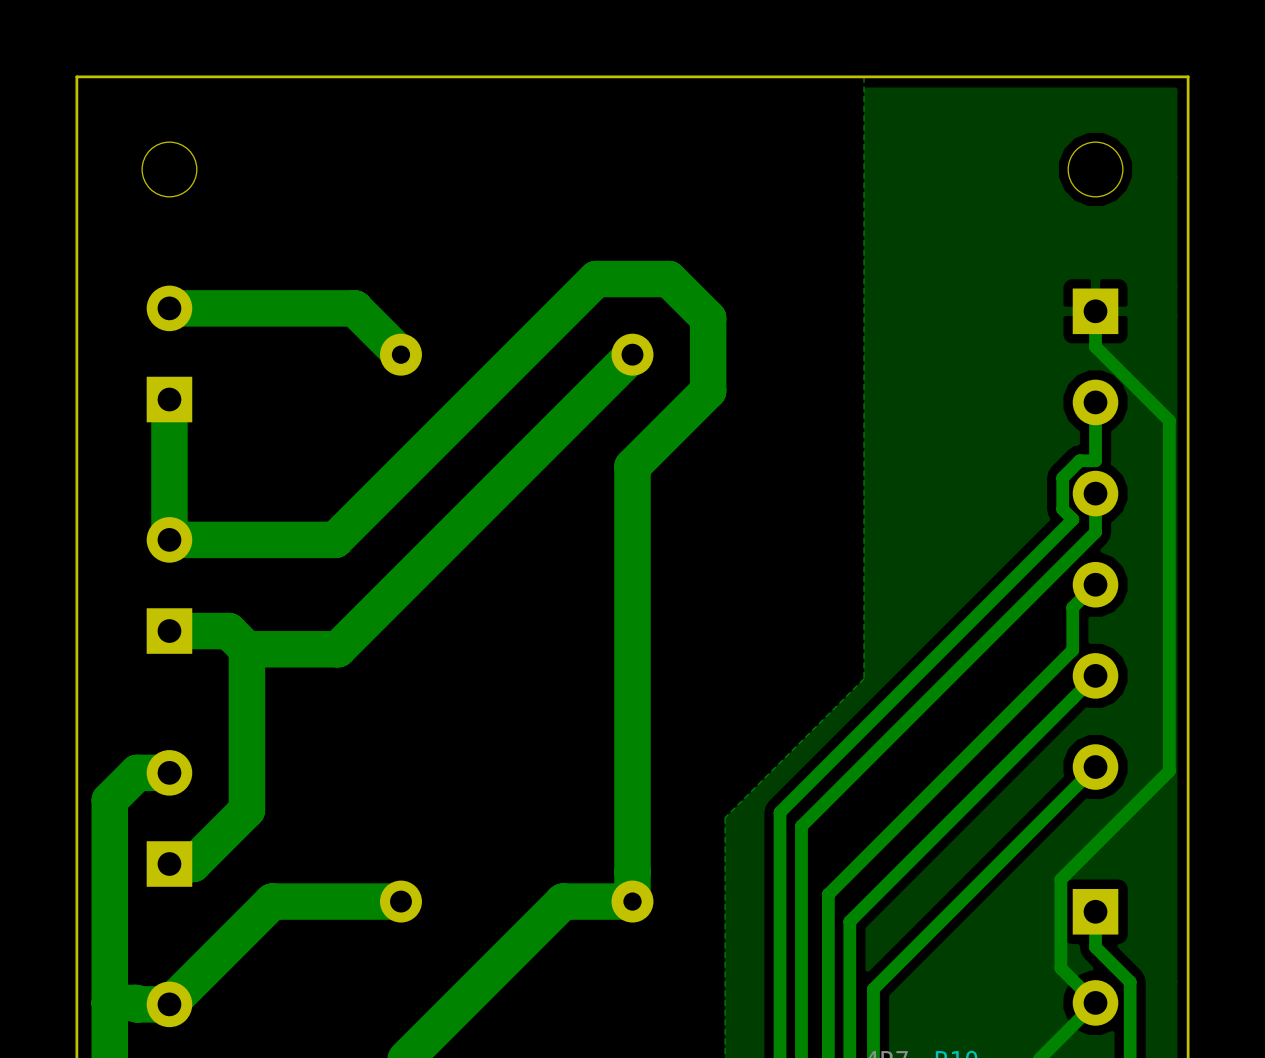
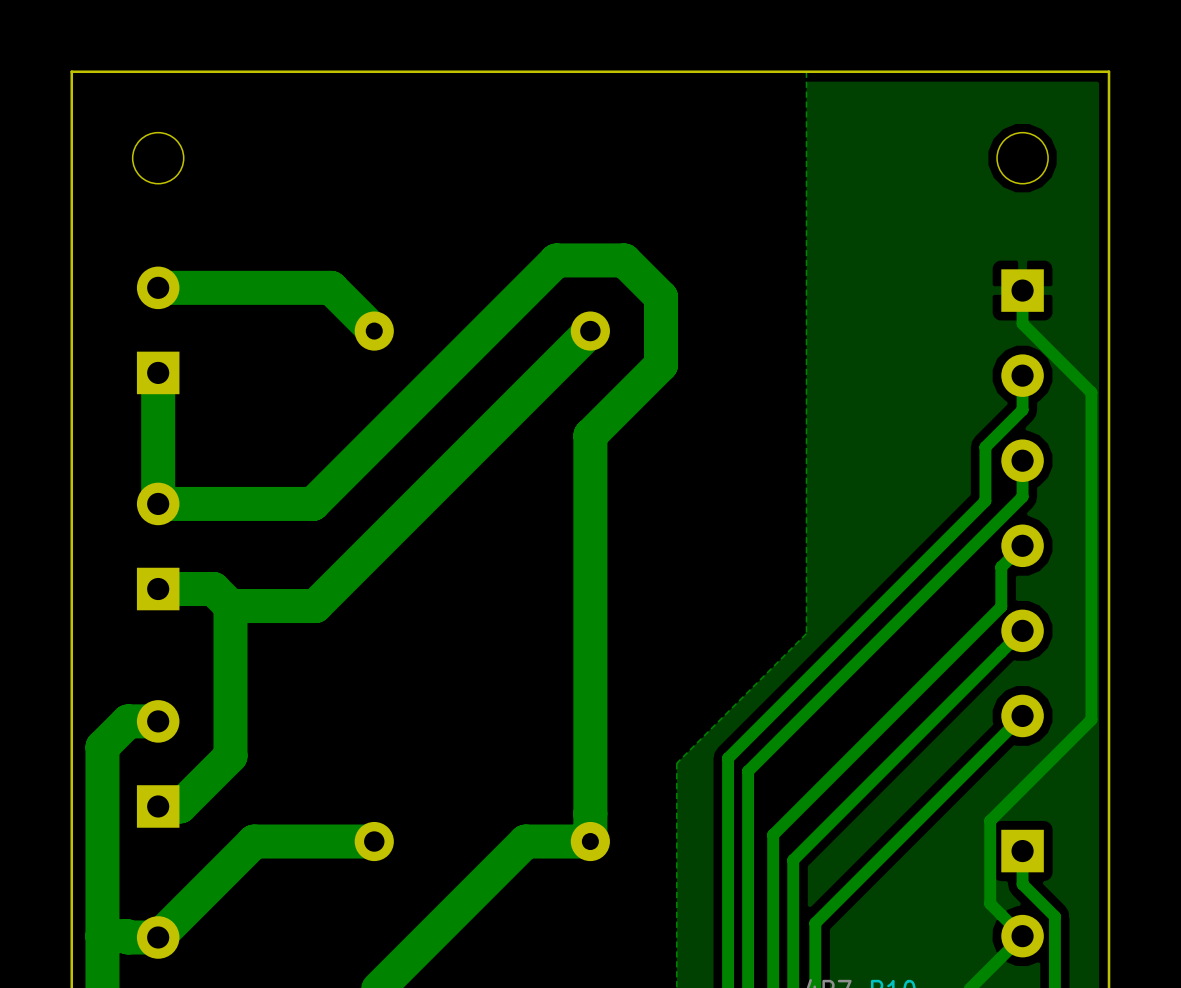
track: (1095, 439) (1095, 460) (1079, 460) (1062, 477) (1062, 509) (1072, 519) (1055, 536) -> (1022, 409) (985, 447) (985, 500)

